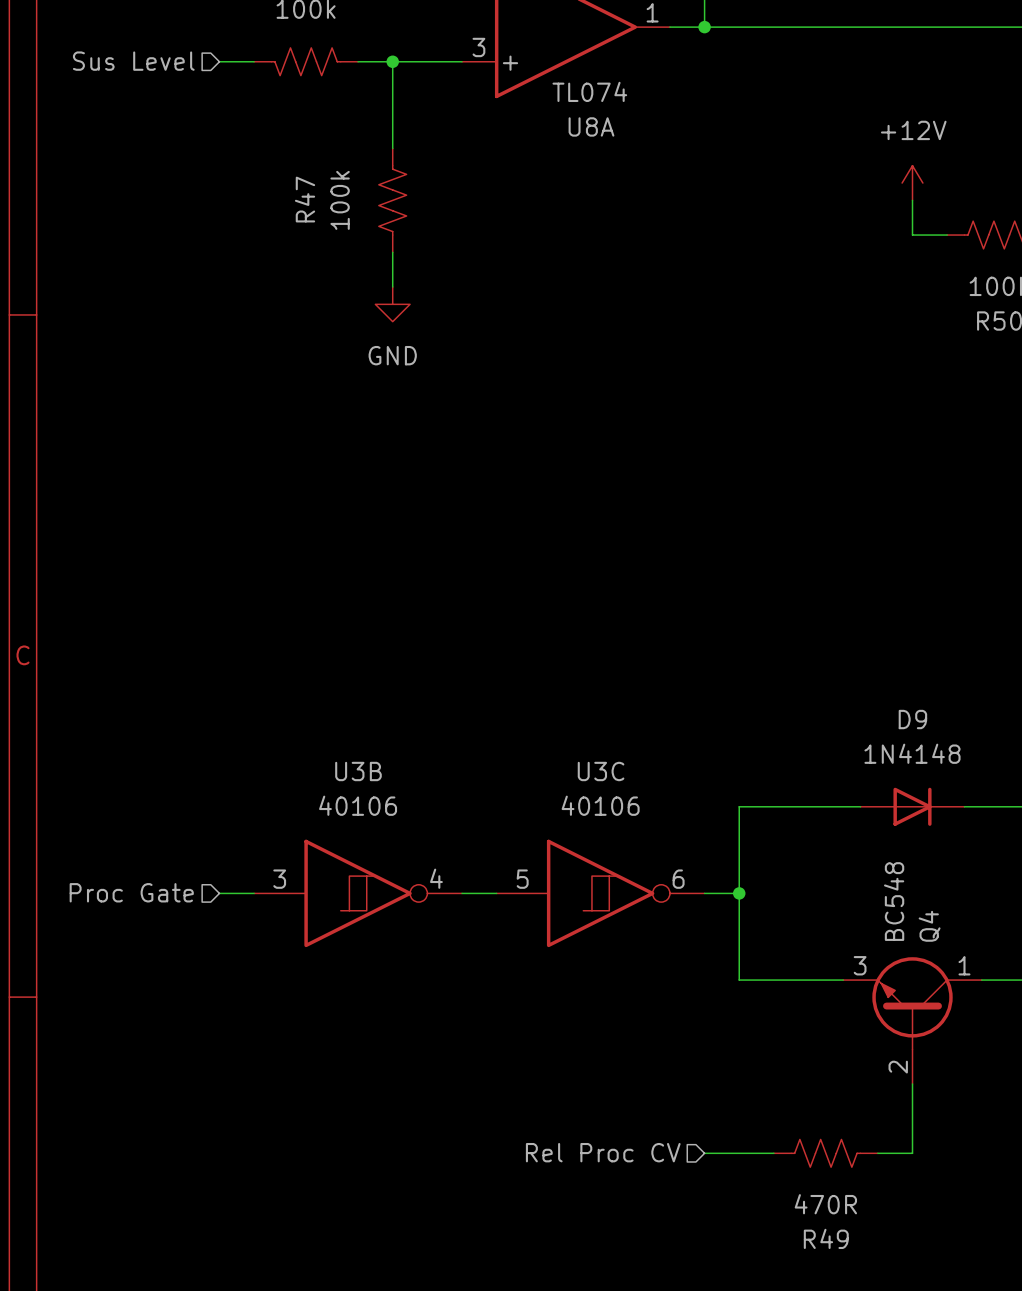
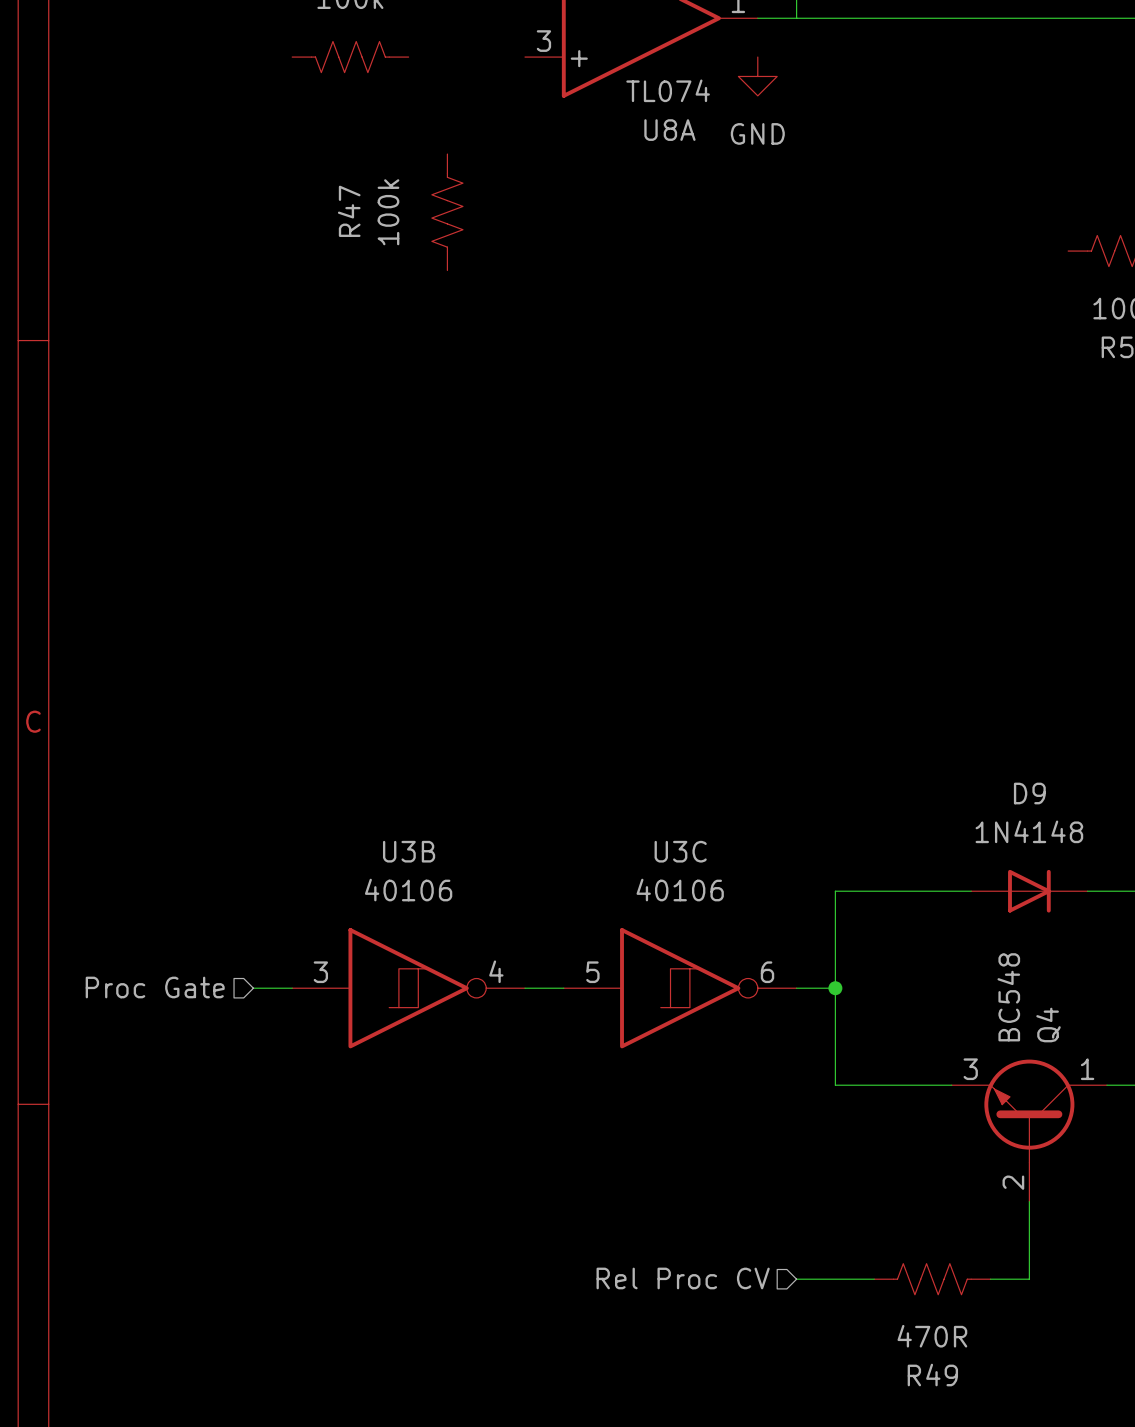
junction: (704, 27) -> none
hierarchical label: Sus Level (133, 61) -> none
wire: (219, 61) (254, 61) -> none
wire: (358, 61) (462, 61) -> none
wire: (392, 61) (392, 148) -> none
junction: (392, 61) -> none
power symbol: none -> GND (757, 76)
power symbol: +12V (912, 183) -> none
wire: (912, 200) (912, 235) (947, 235) -> none
wire: (392, 252) (392, 287) -> none
power symbol: GND (392, 304) -> none

